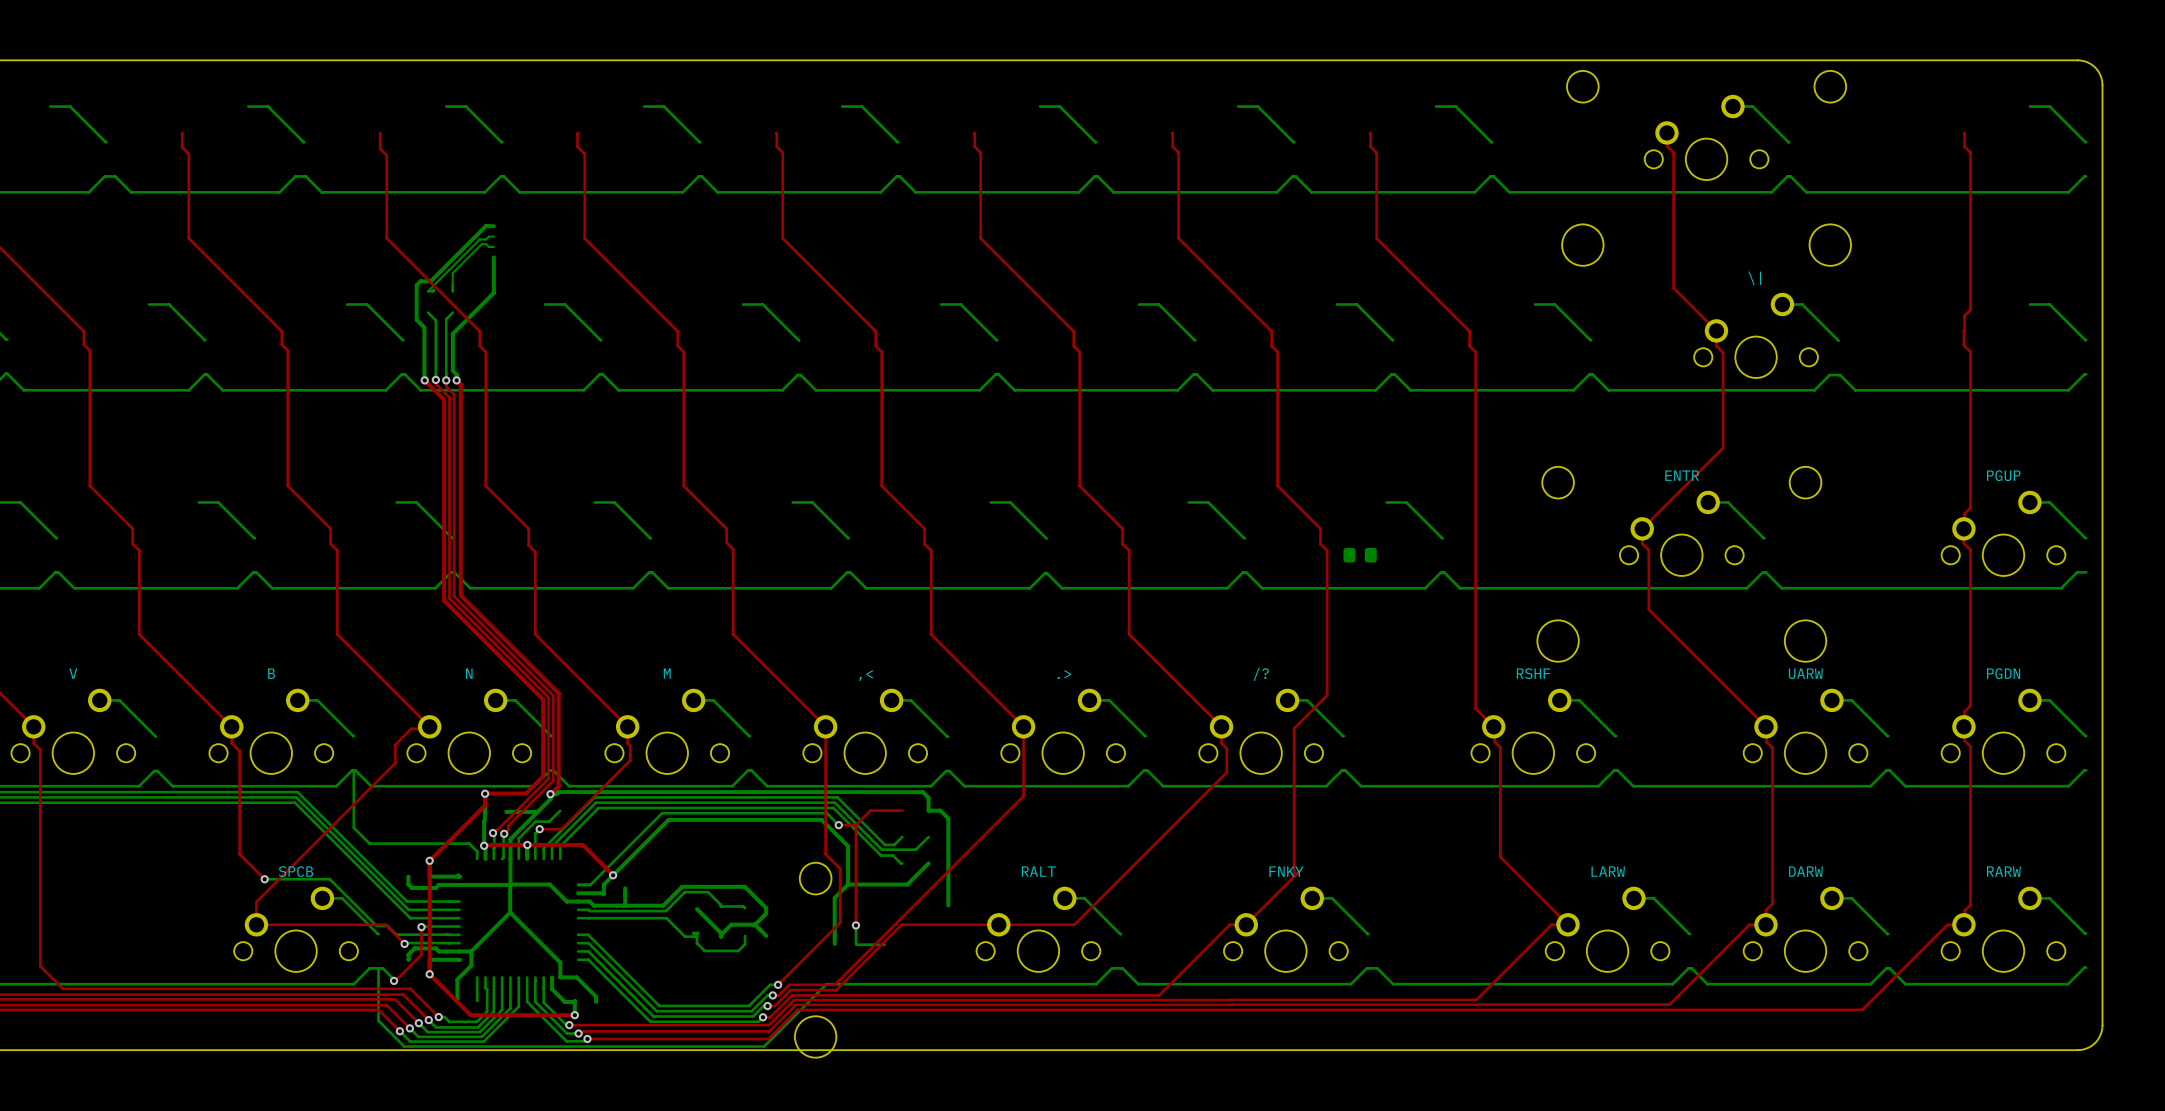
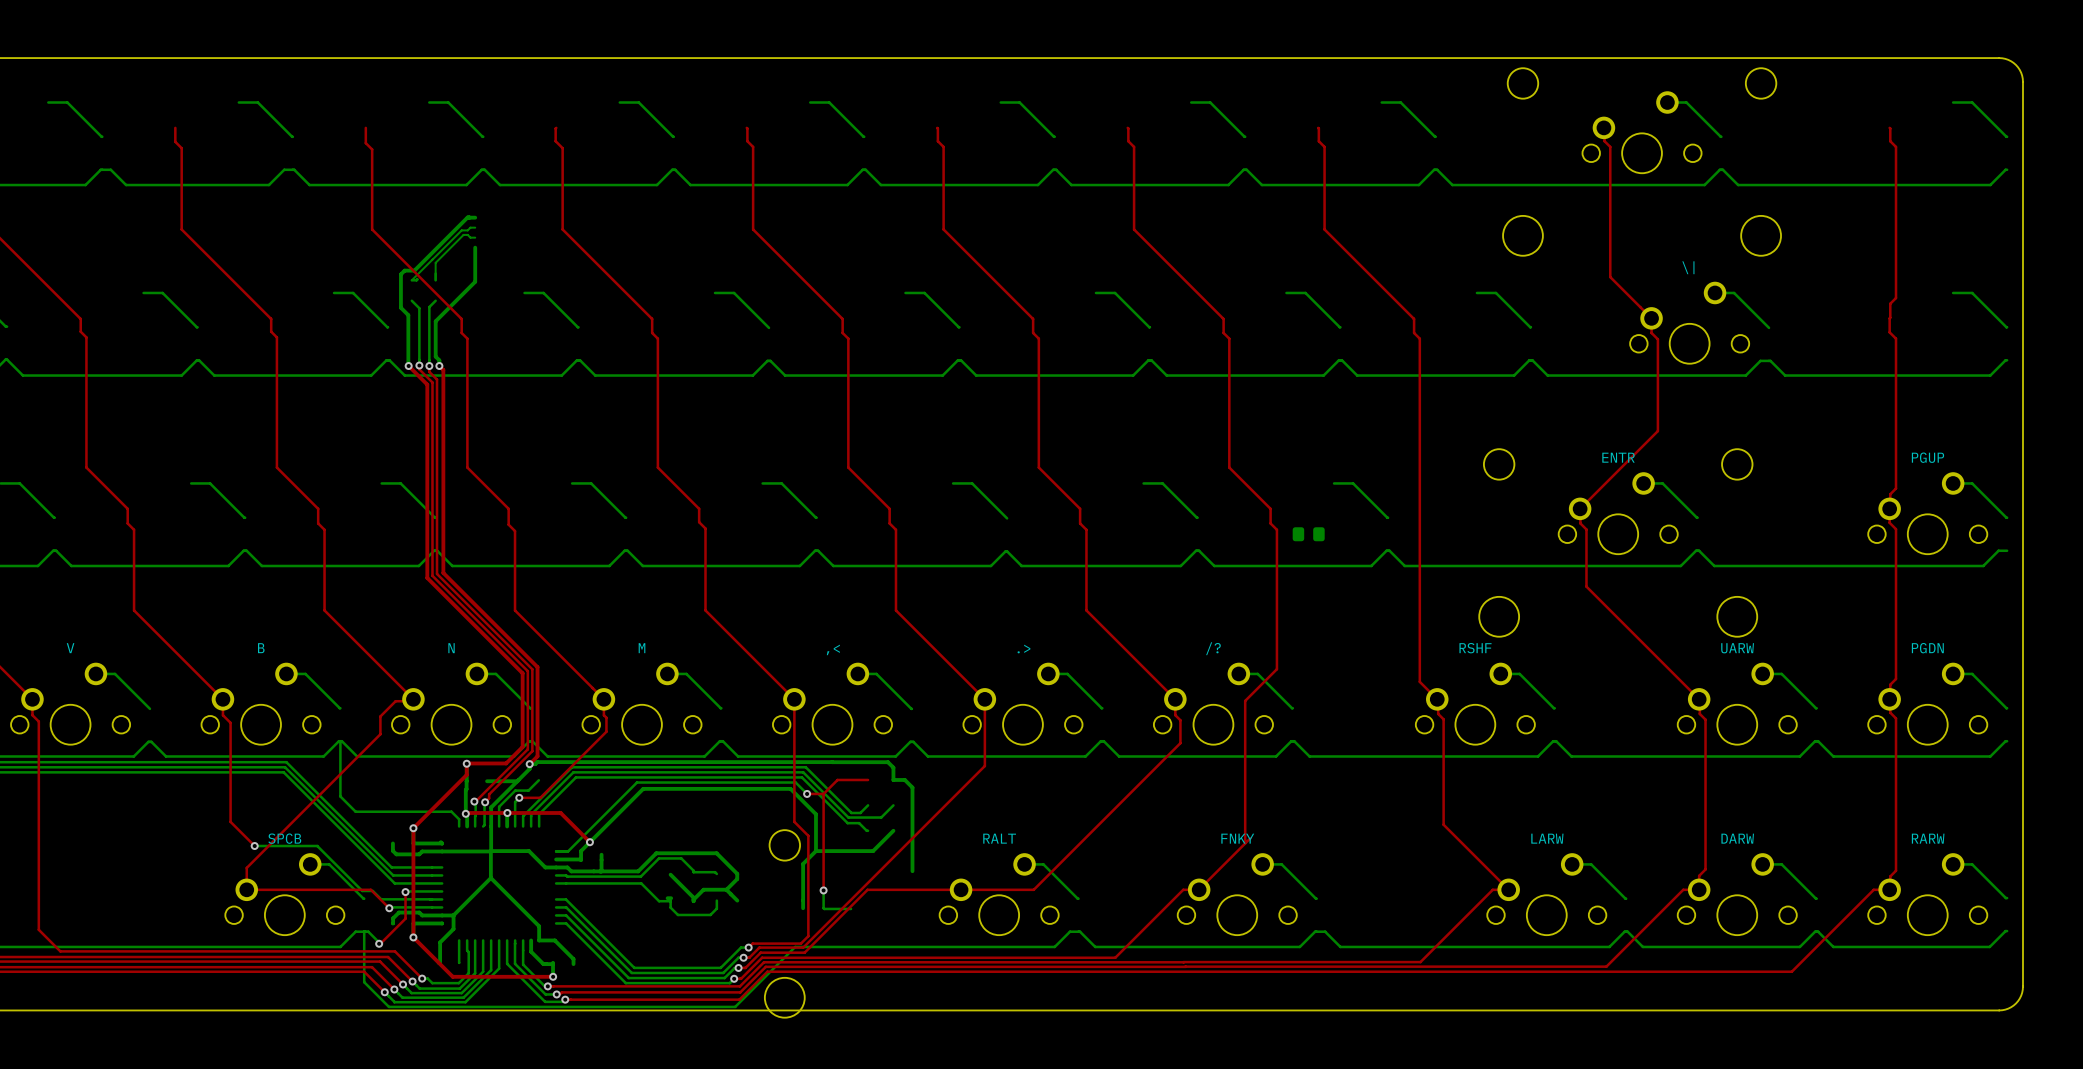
top track: (840, 922) (782, 980) -> (808, 887) (808, 936) (800, 943) (752, 943)

